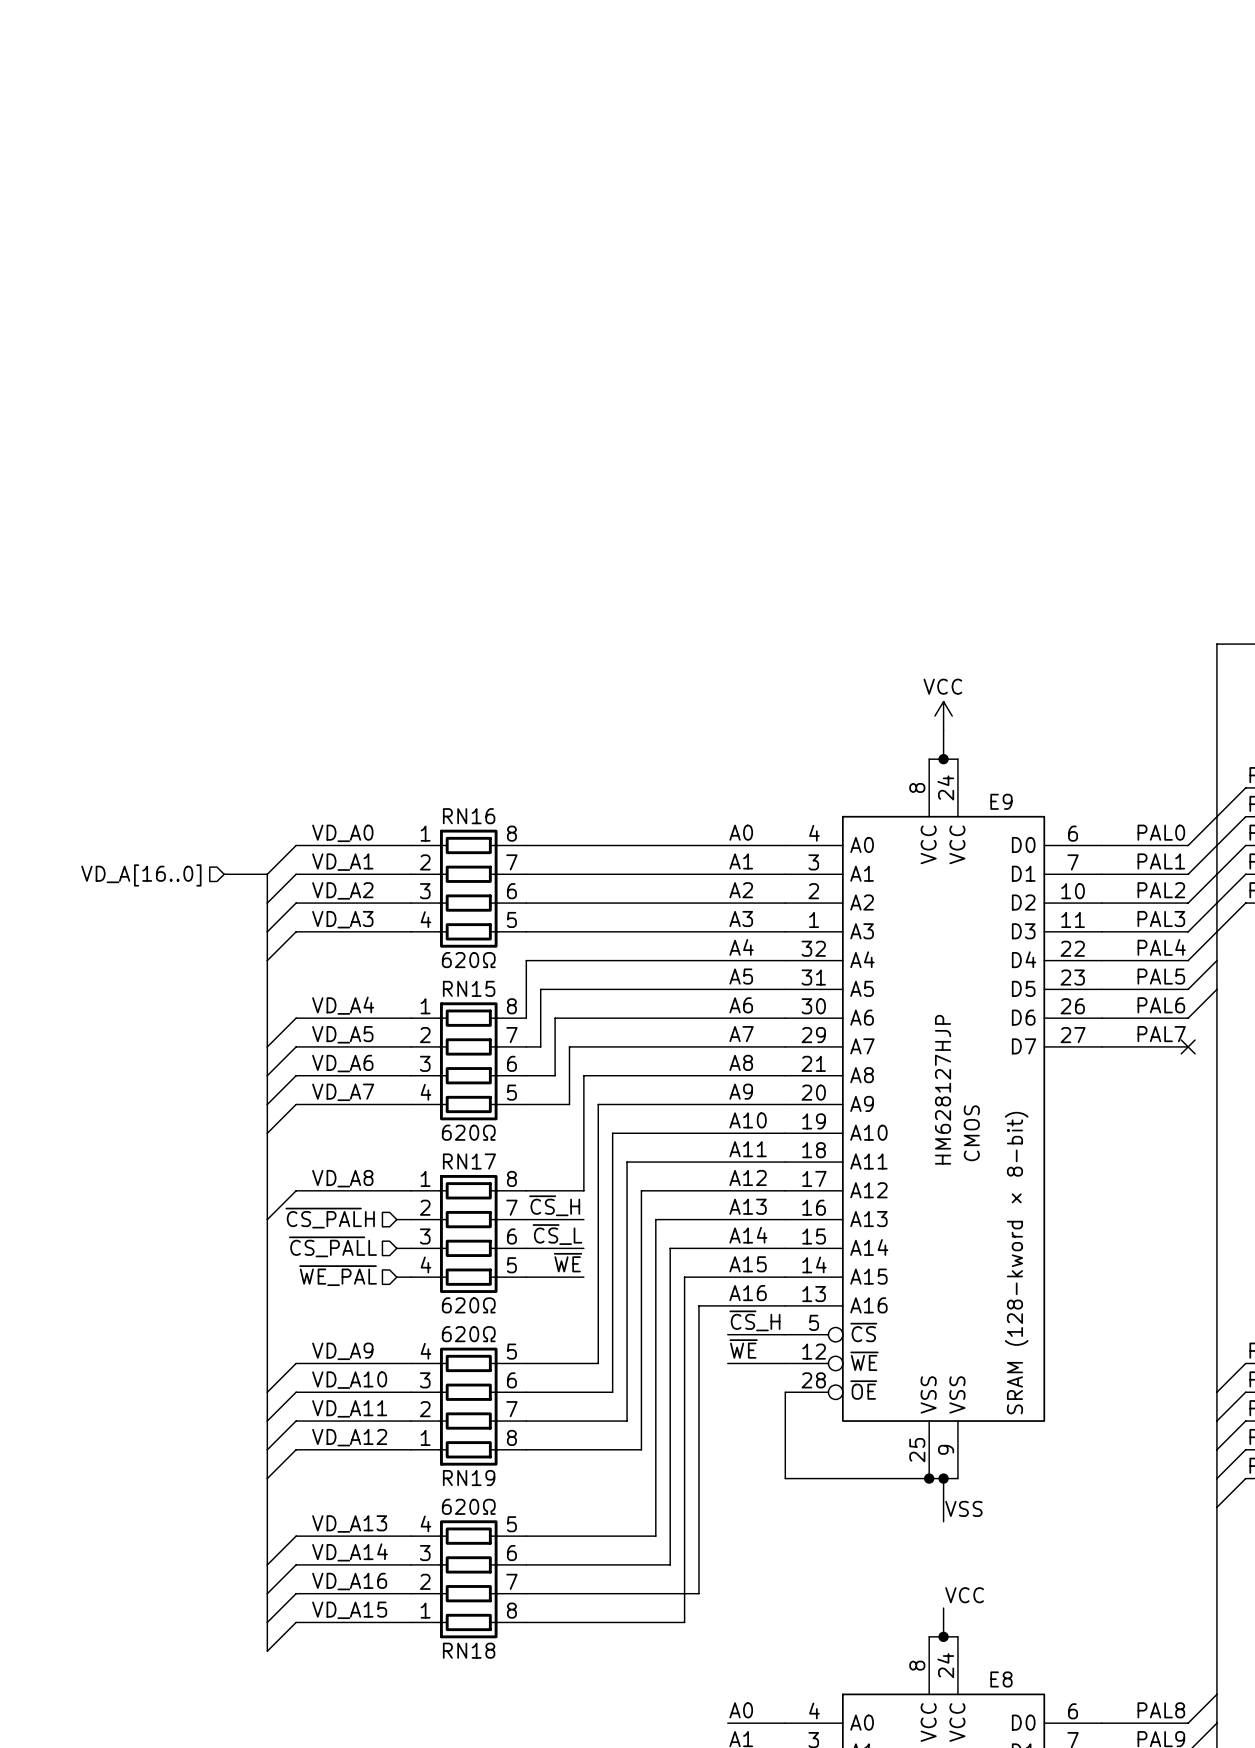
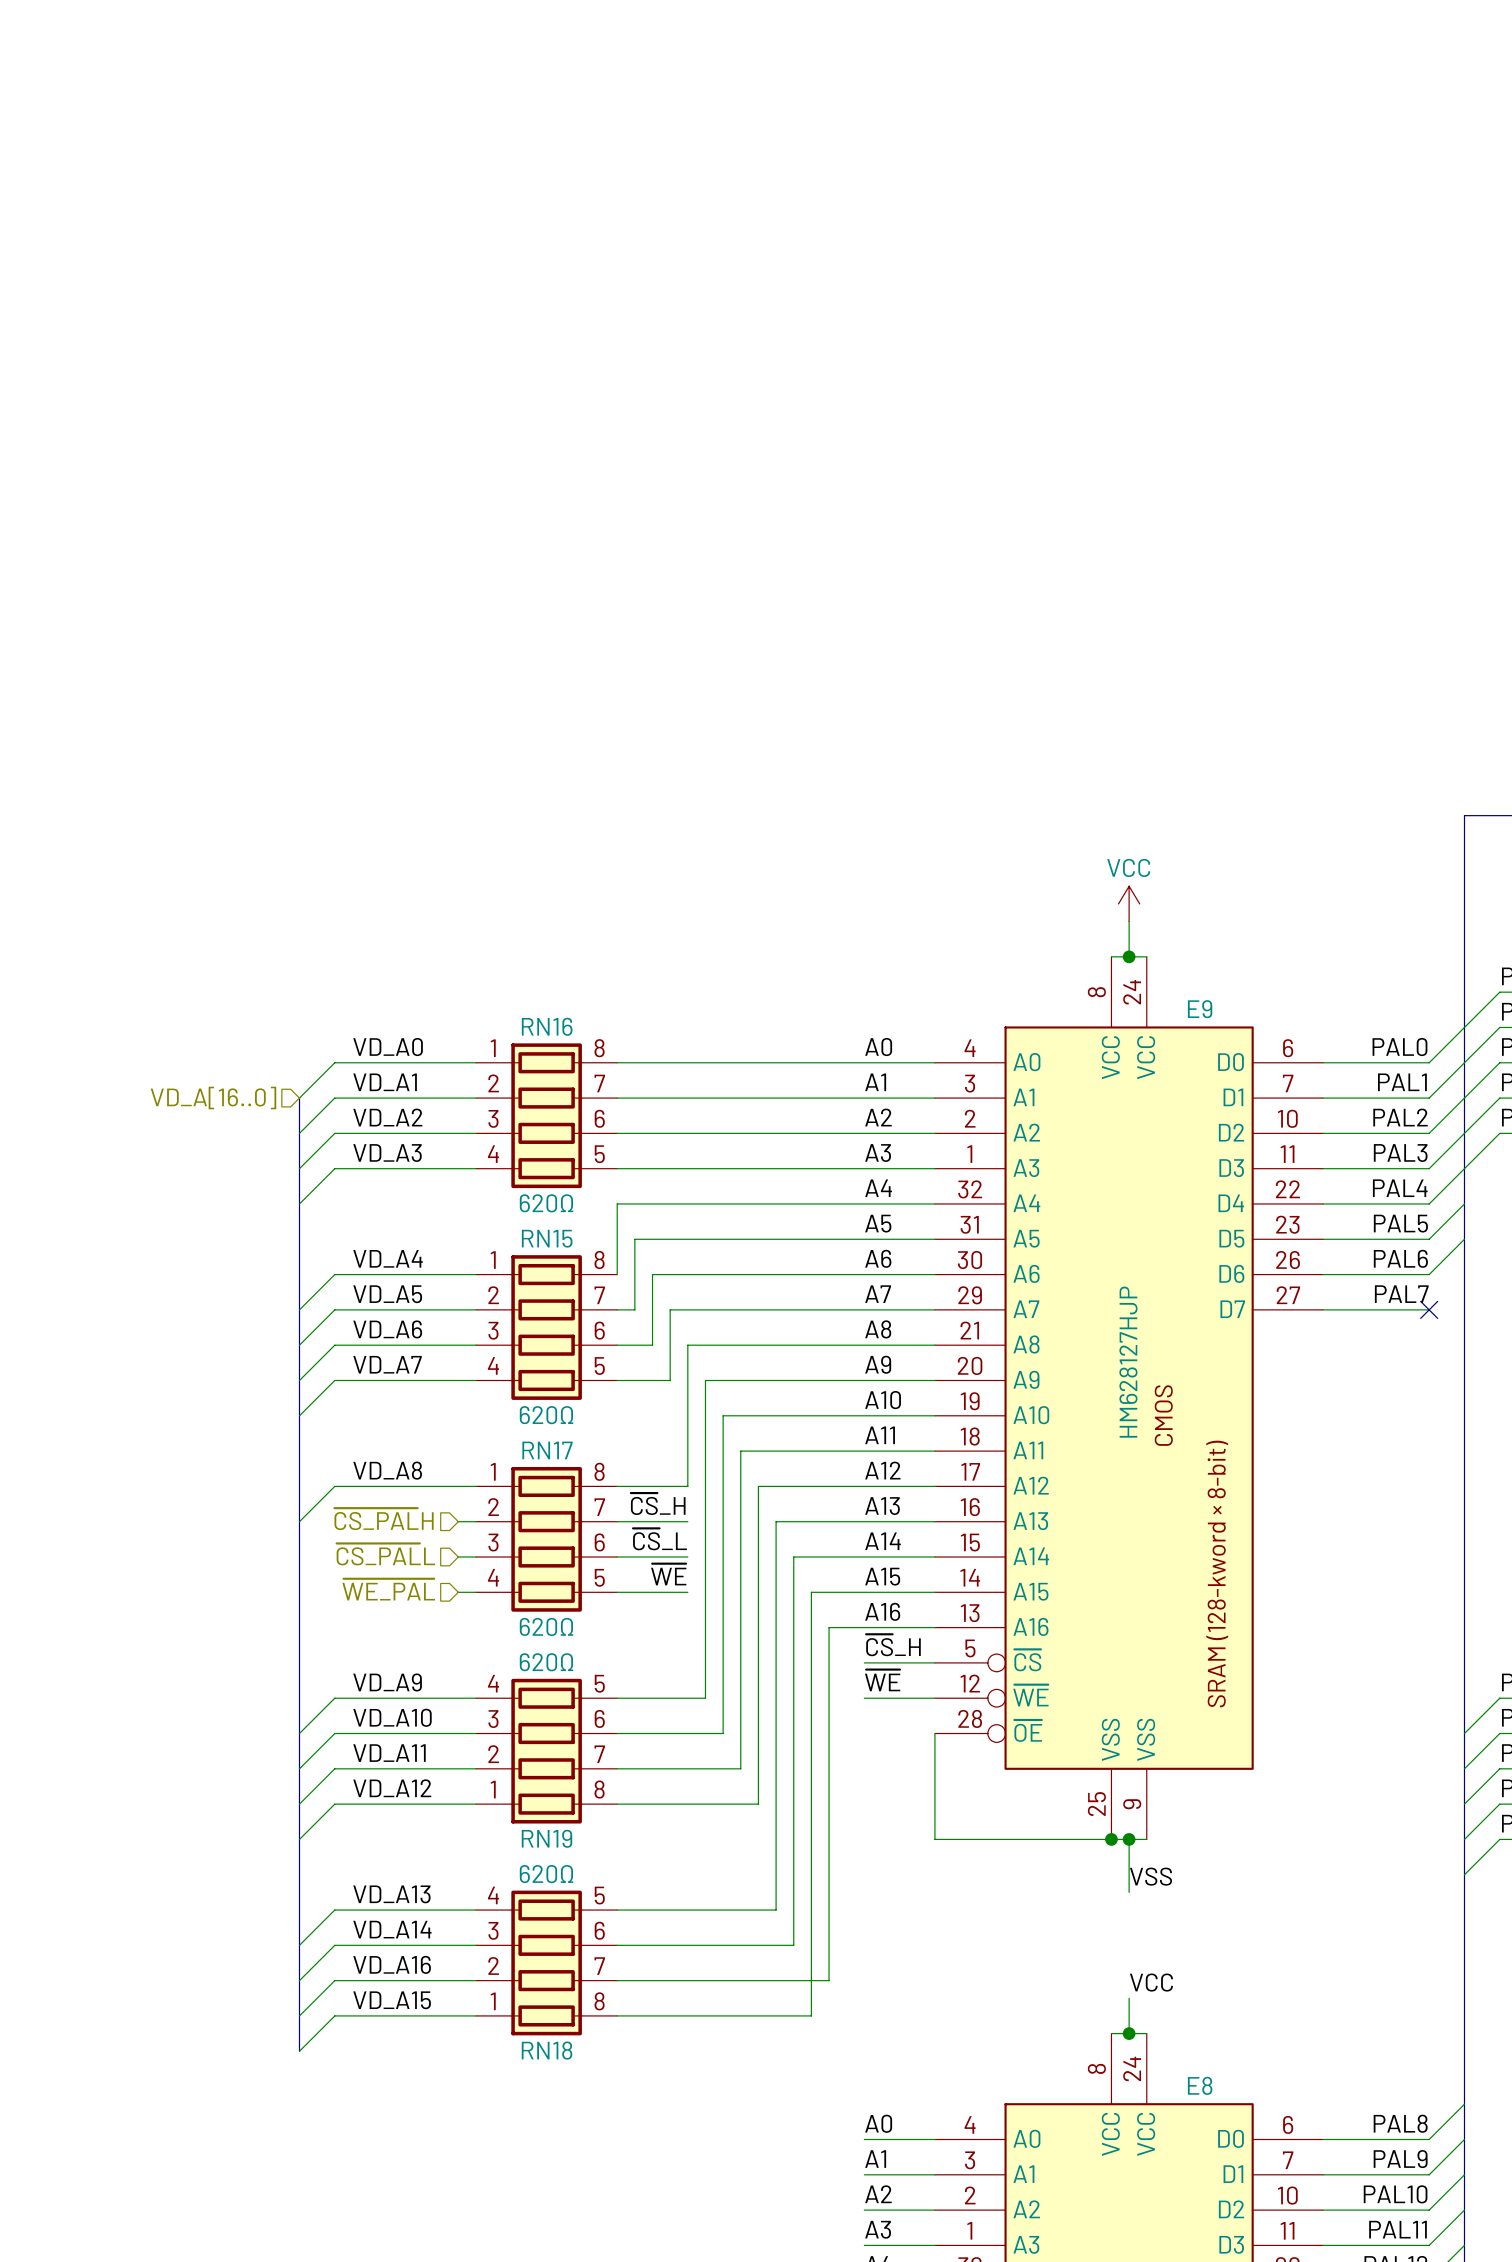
bus: (224, 874) (267, 874) -> none
hierarchical label position: VD_A[16..0] (141, 875) -> VD_A[16..0] (213, 1098)

